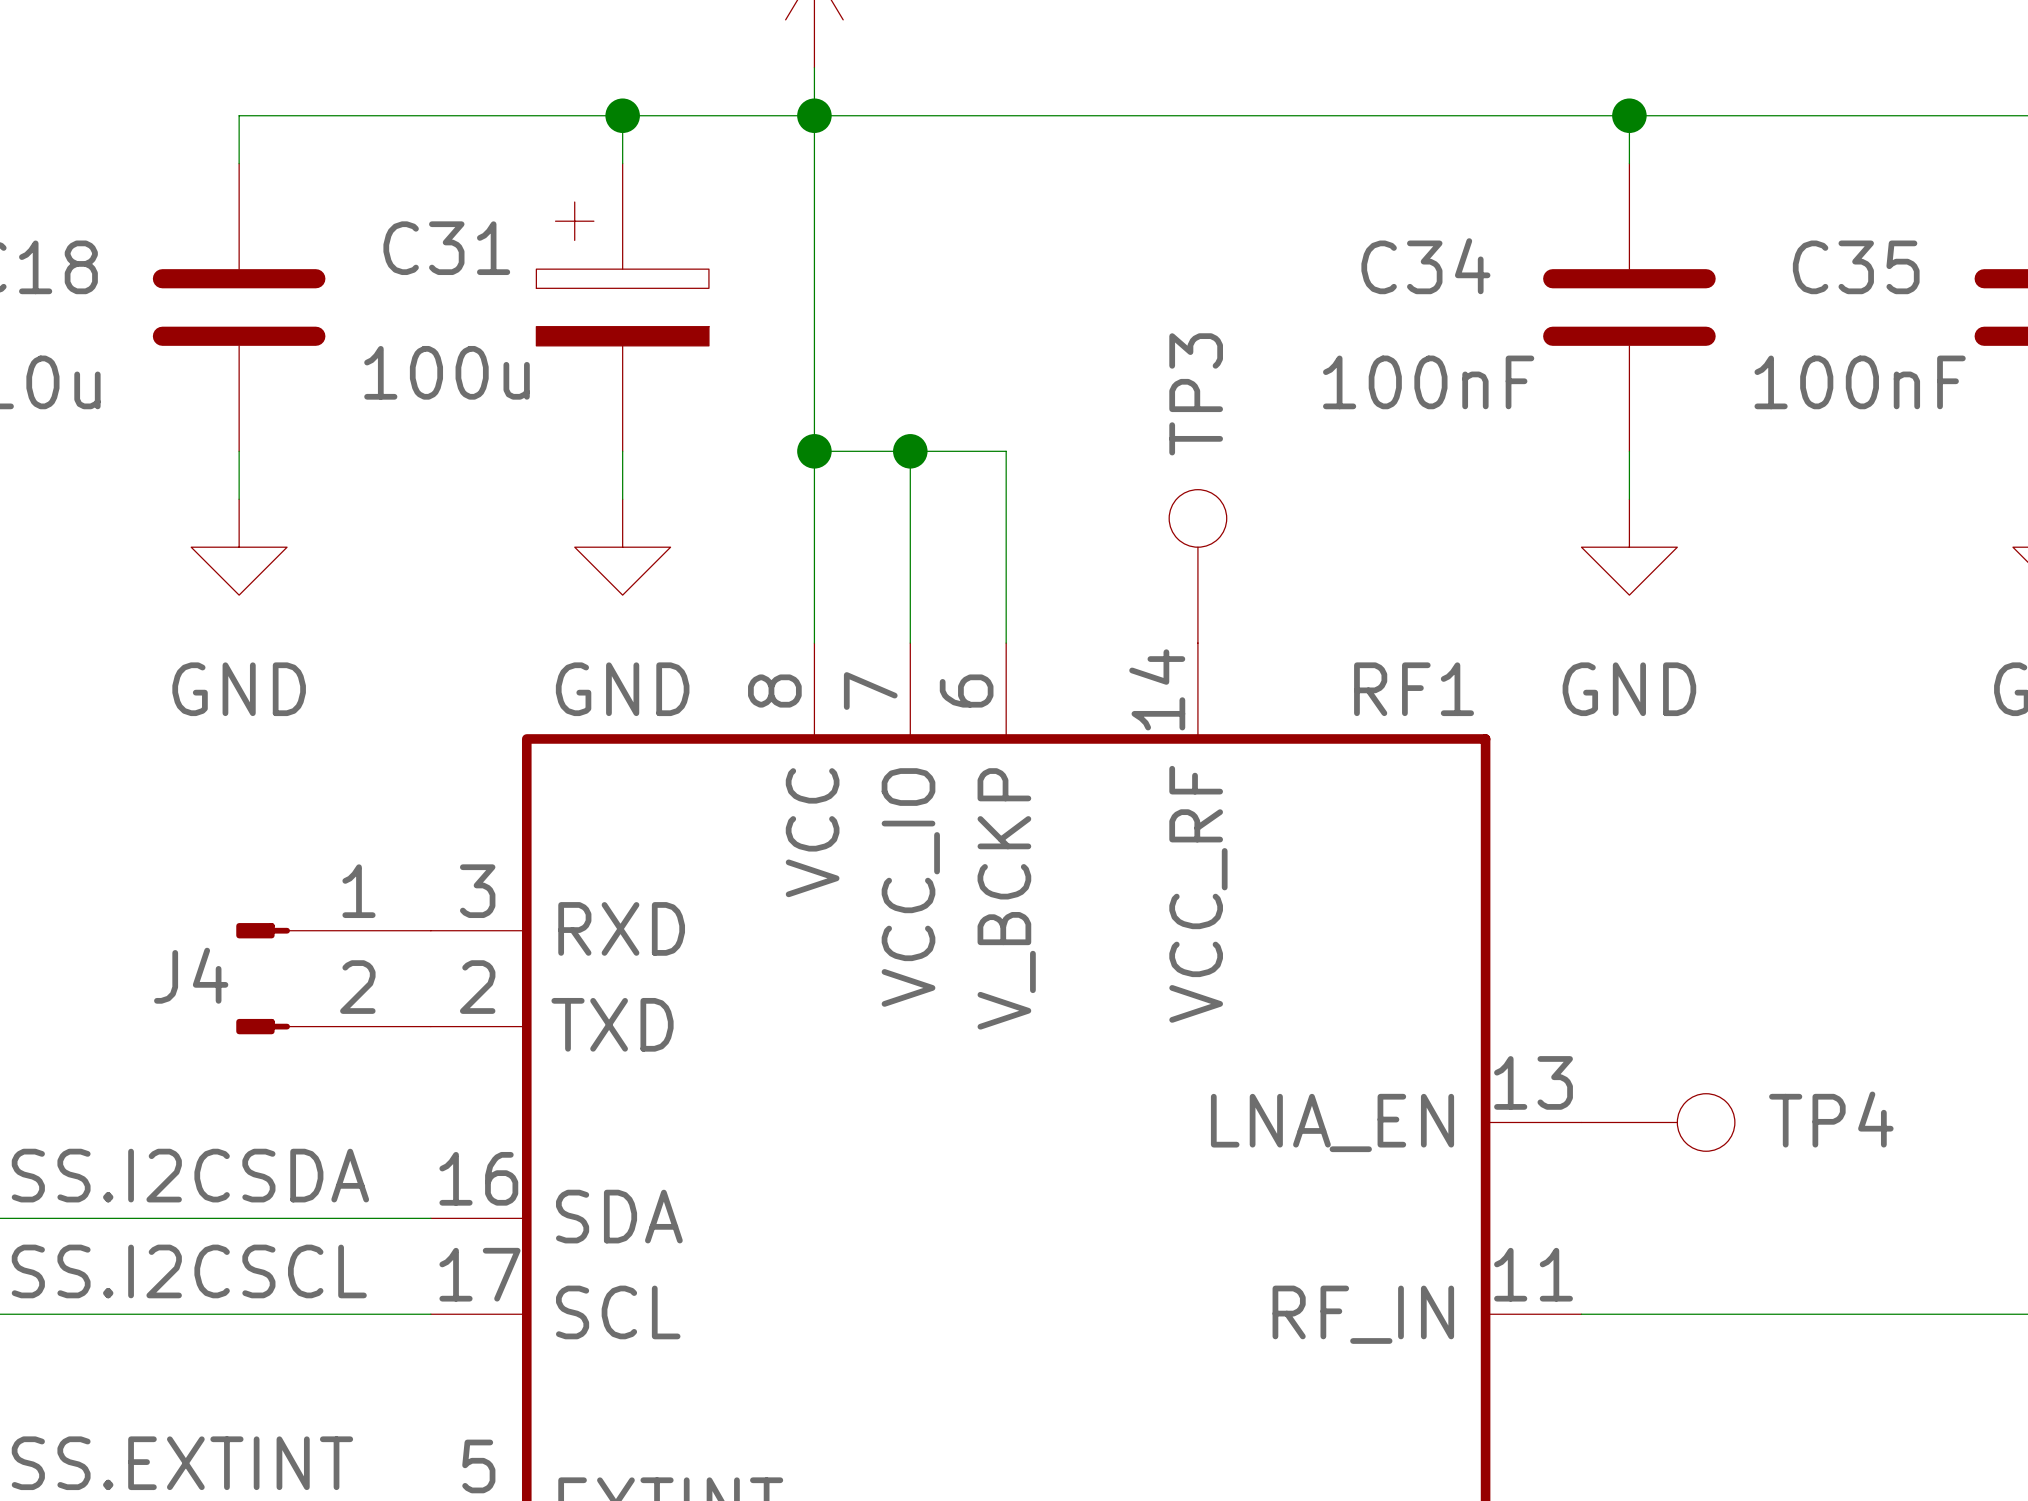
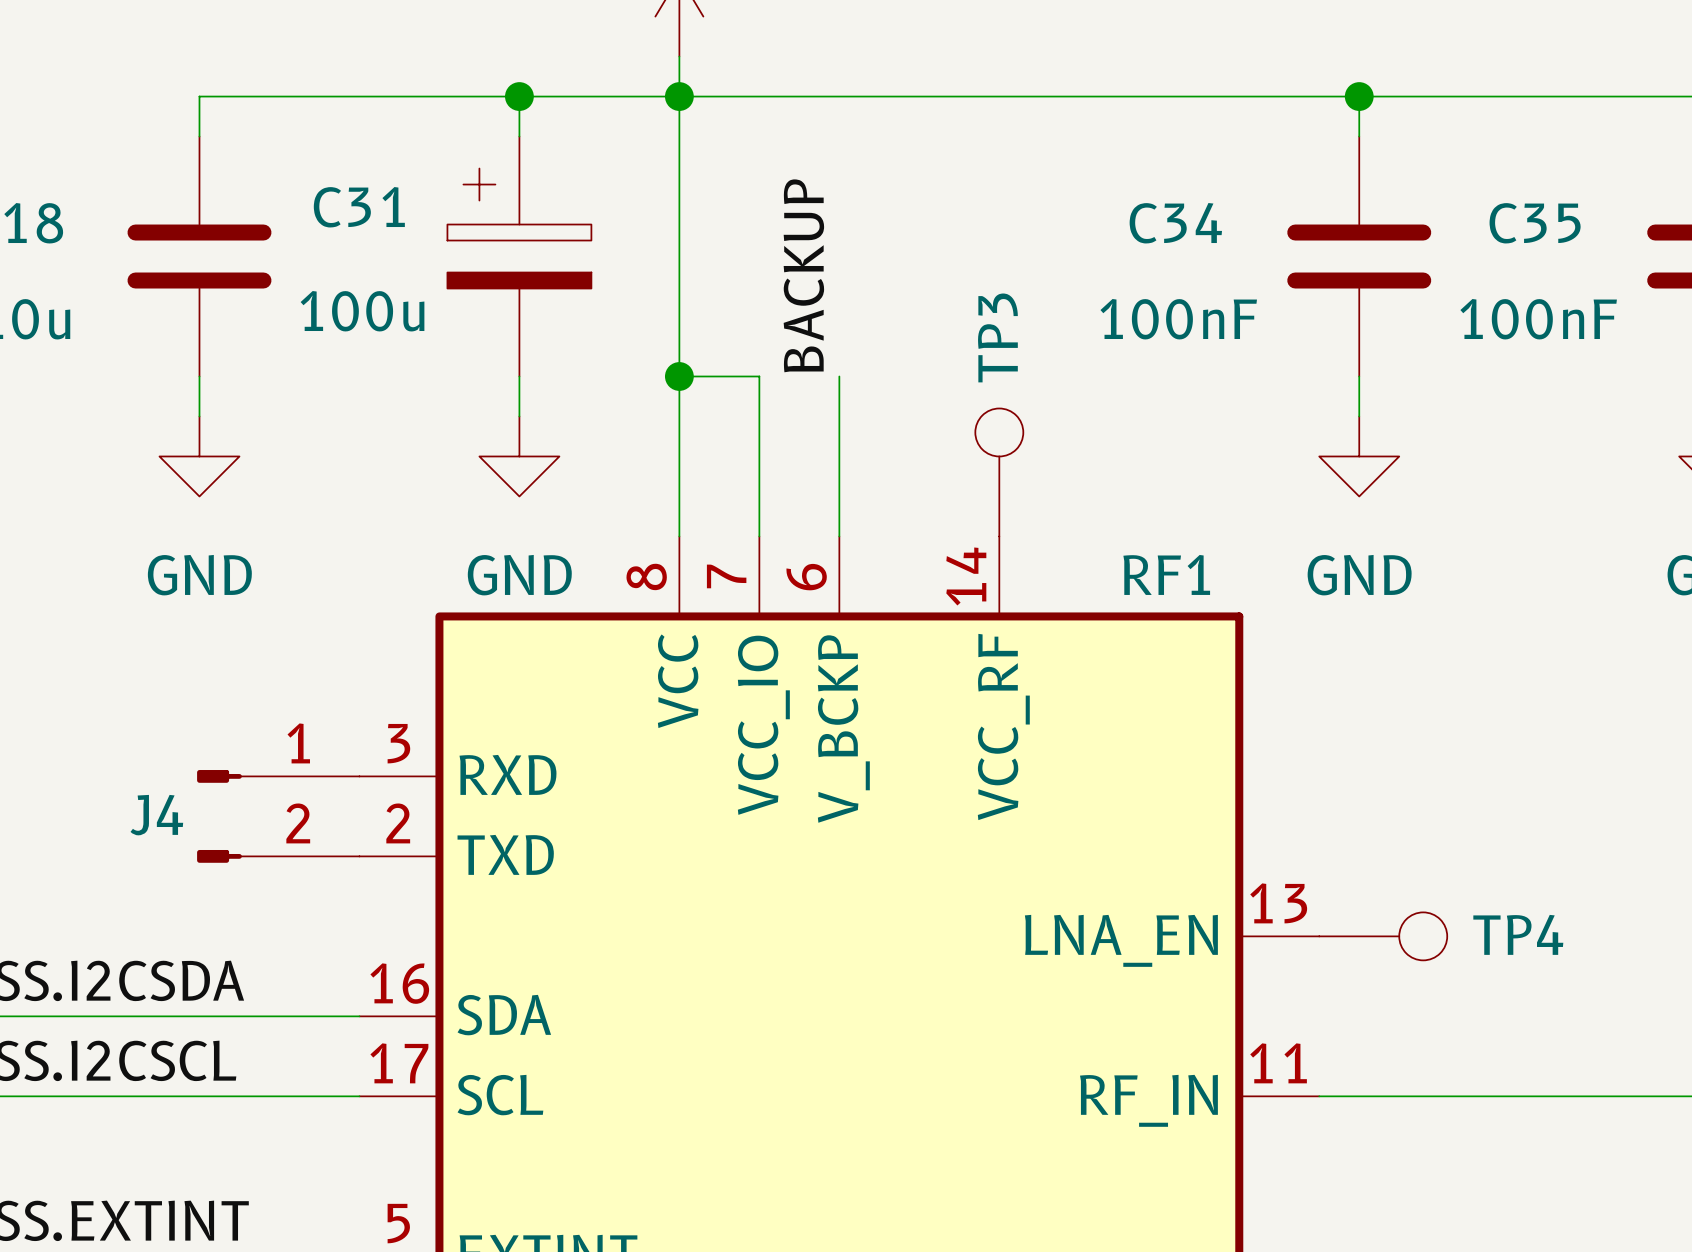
label: none -> BACKUP (803, 275)
wire: (910, 451) (1006, 451) -> none
junction: (910, 451) -> none

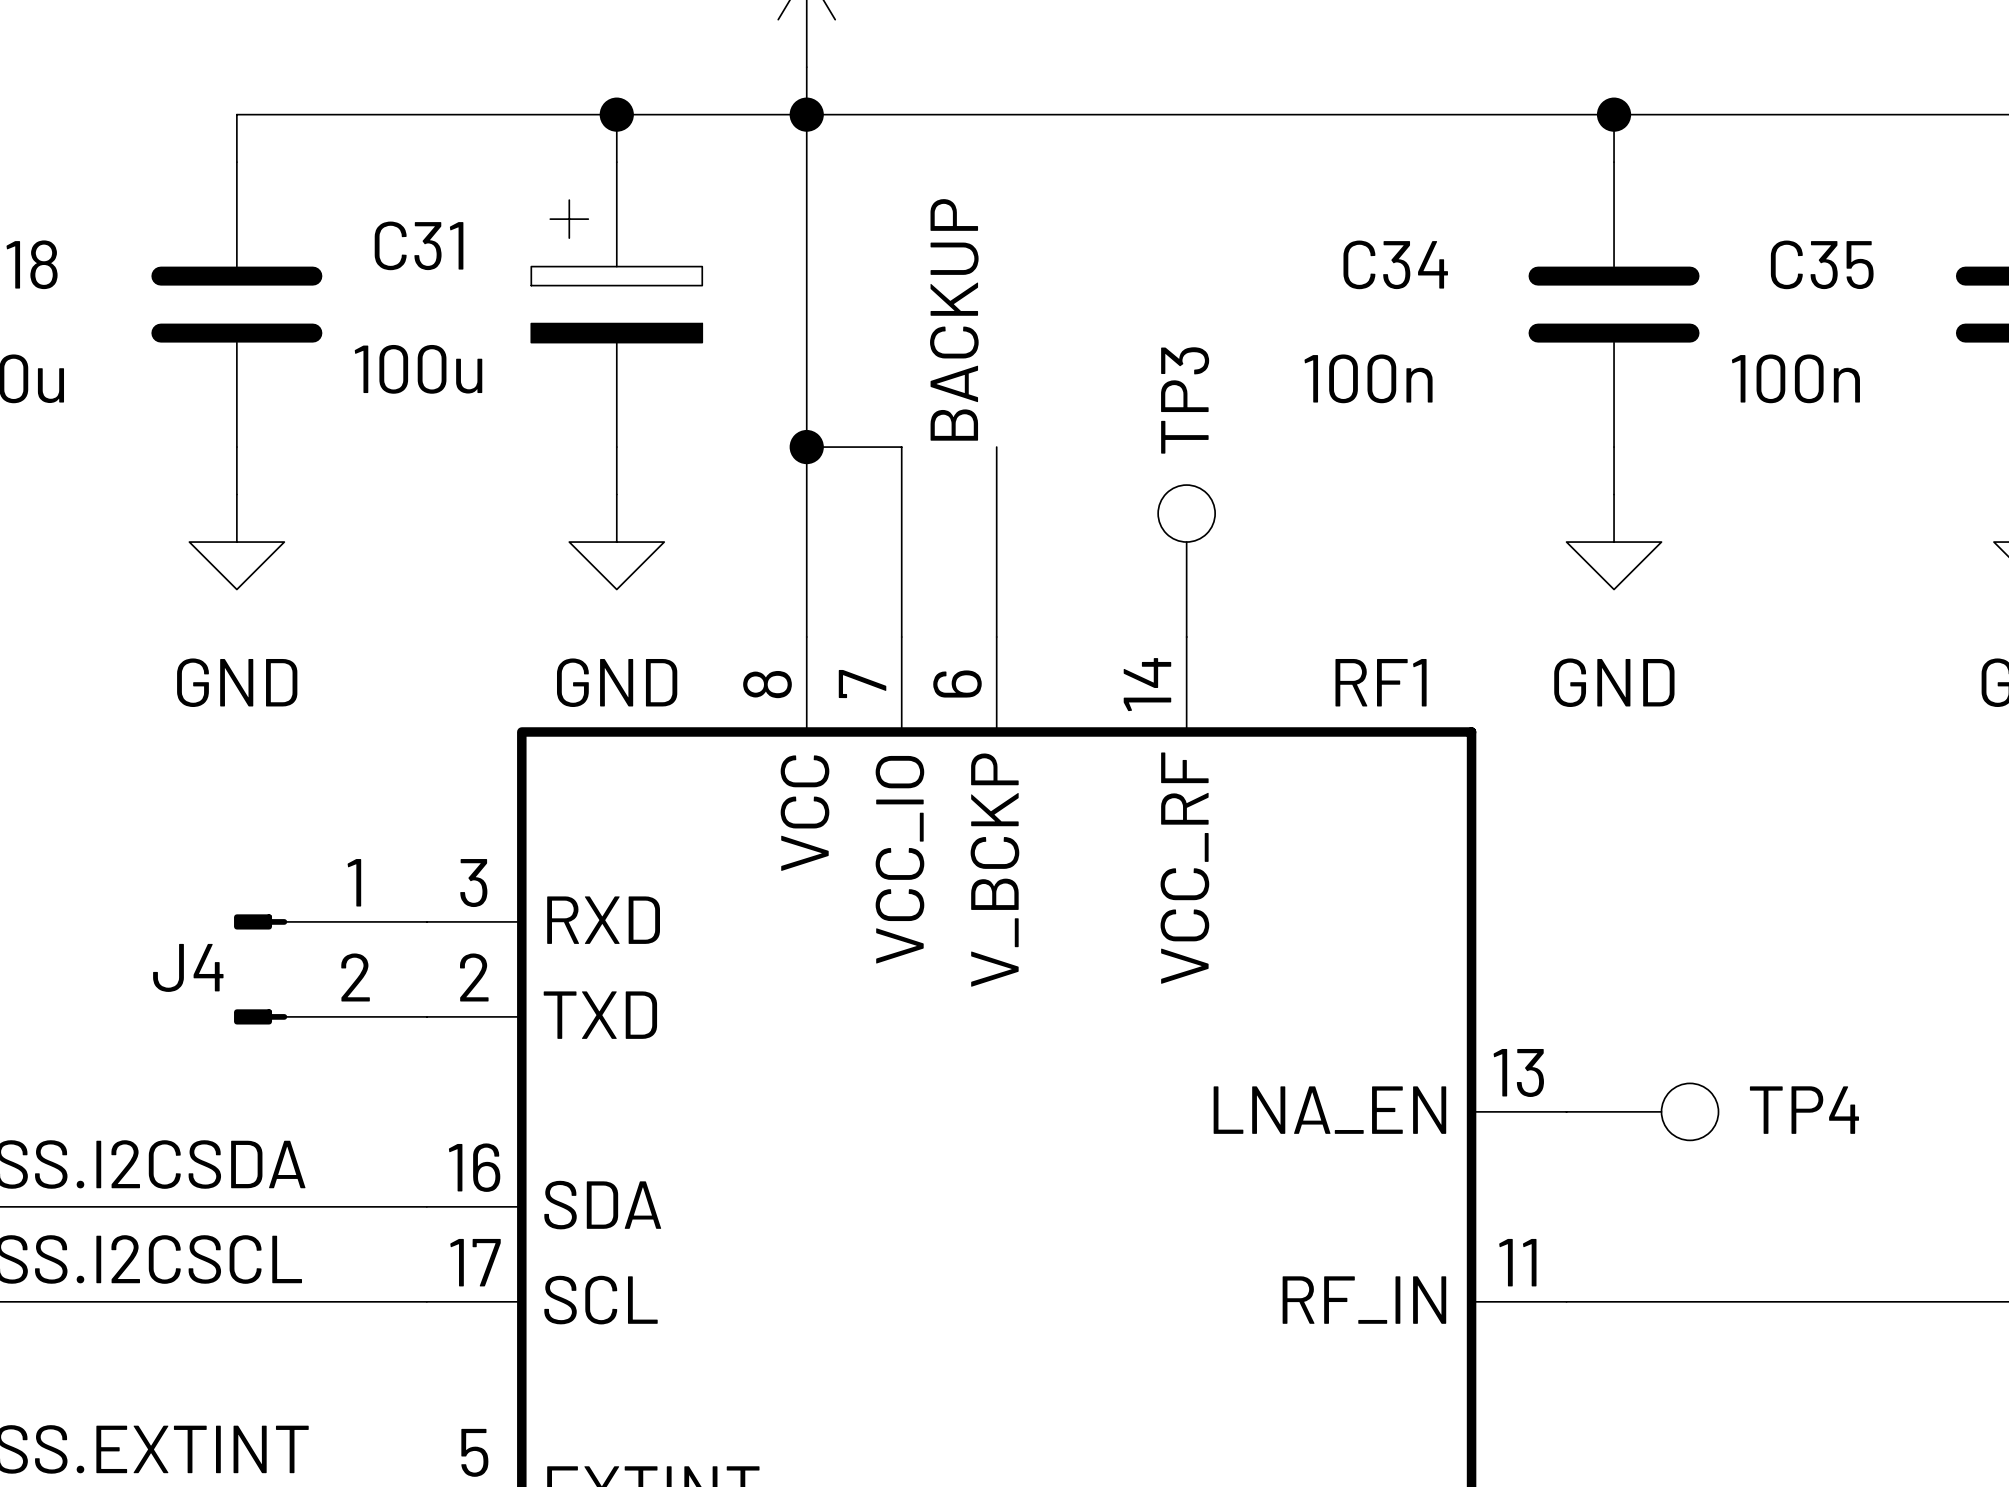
C34 value: 100nF (1178, 319) -> 100n (1368, 378)
C35 value: 100nF (1538, 319) -> 100n (1795, 378)

